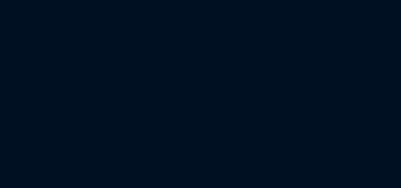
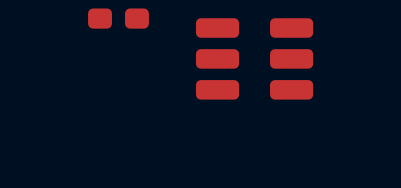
part: none -> (118, 18)
part: none -> (254, 58)

